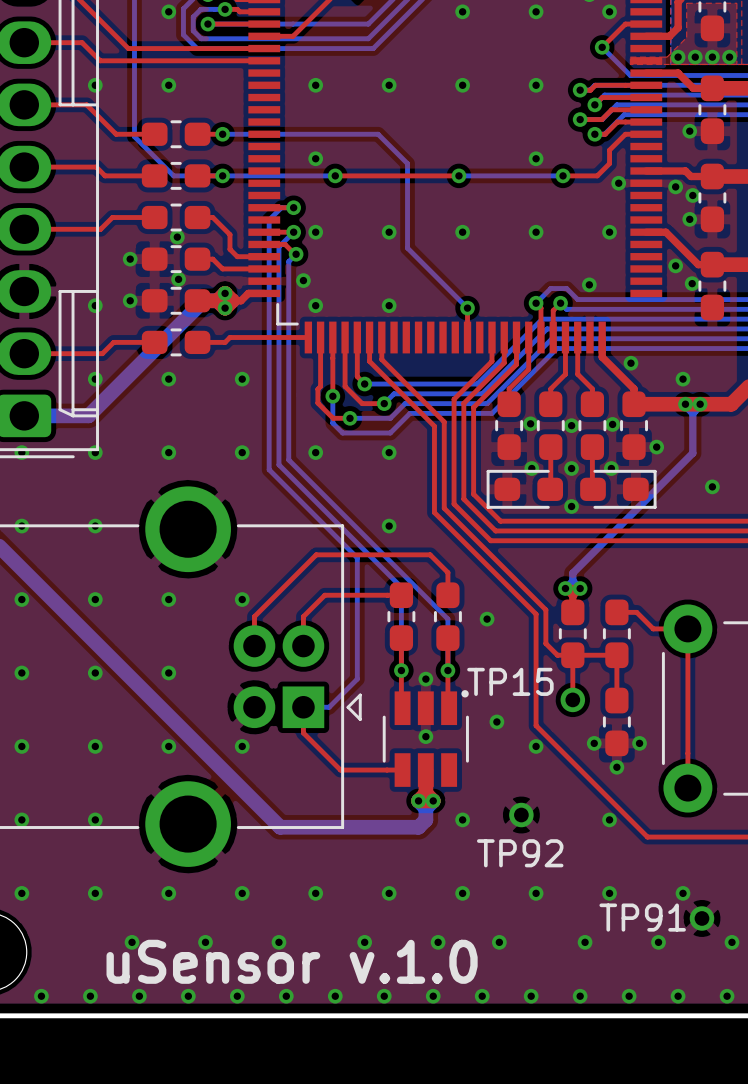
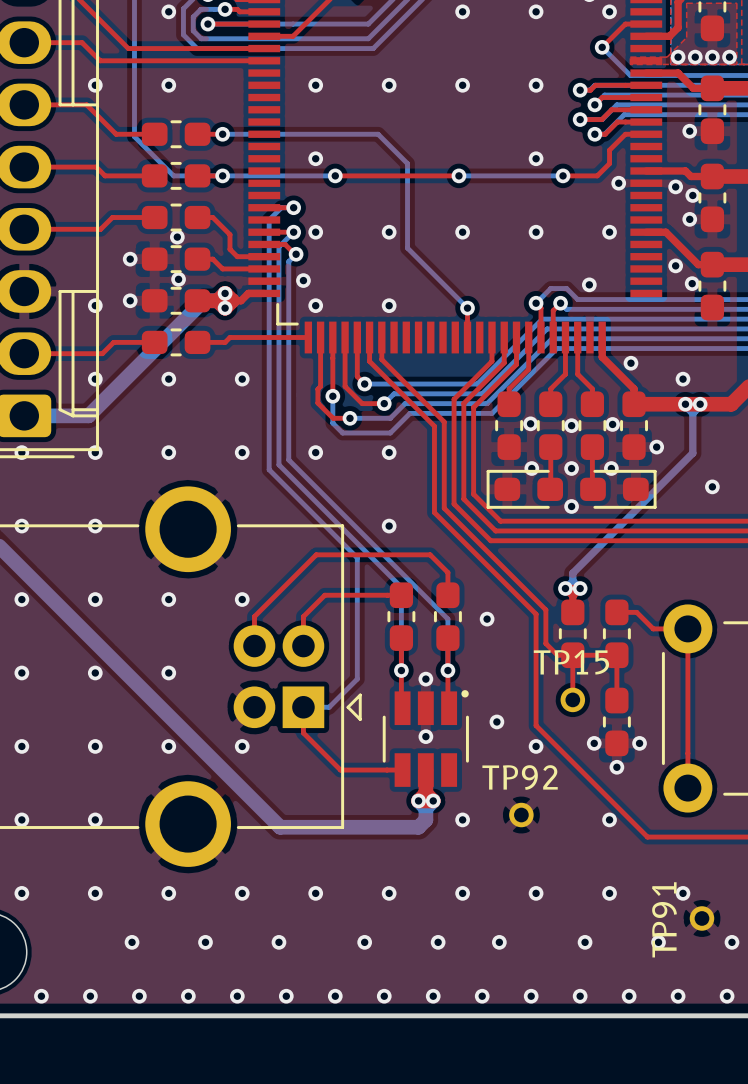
TP15 name position: TP15 (510, 681) -> TP15 (571, 662)
TP92 name position: TP92 (520, 853) -> TP92 (520, 777)
TP91 name rotation: 0° (642, 917) -> 90° counterclockwise (664, 919)
text: uSensor v.1.0 (292, 961) -> none

